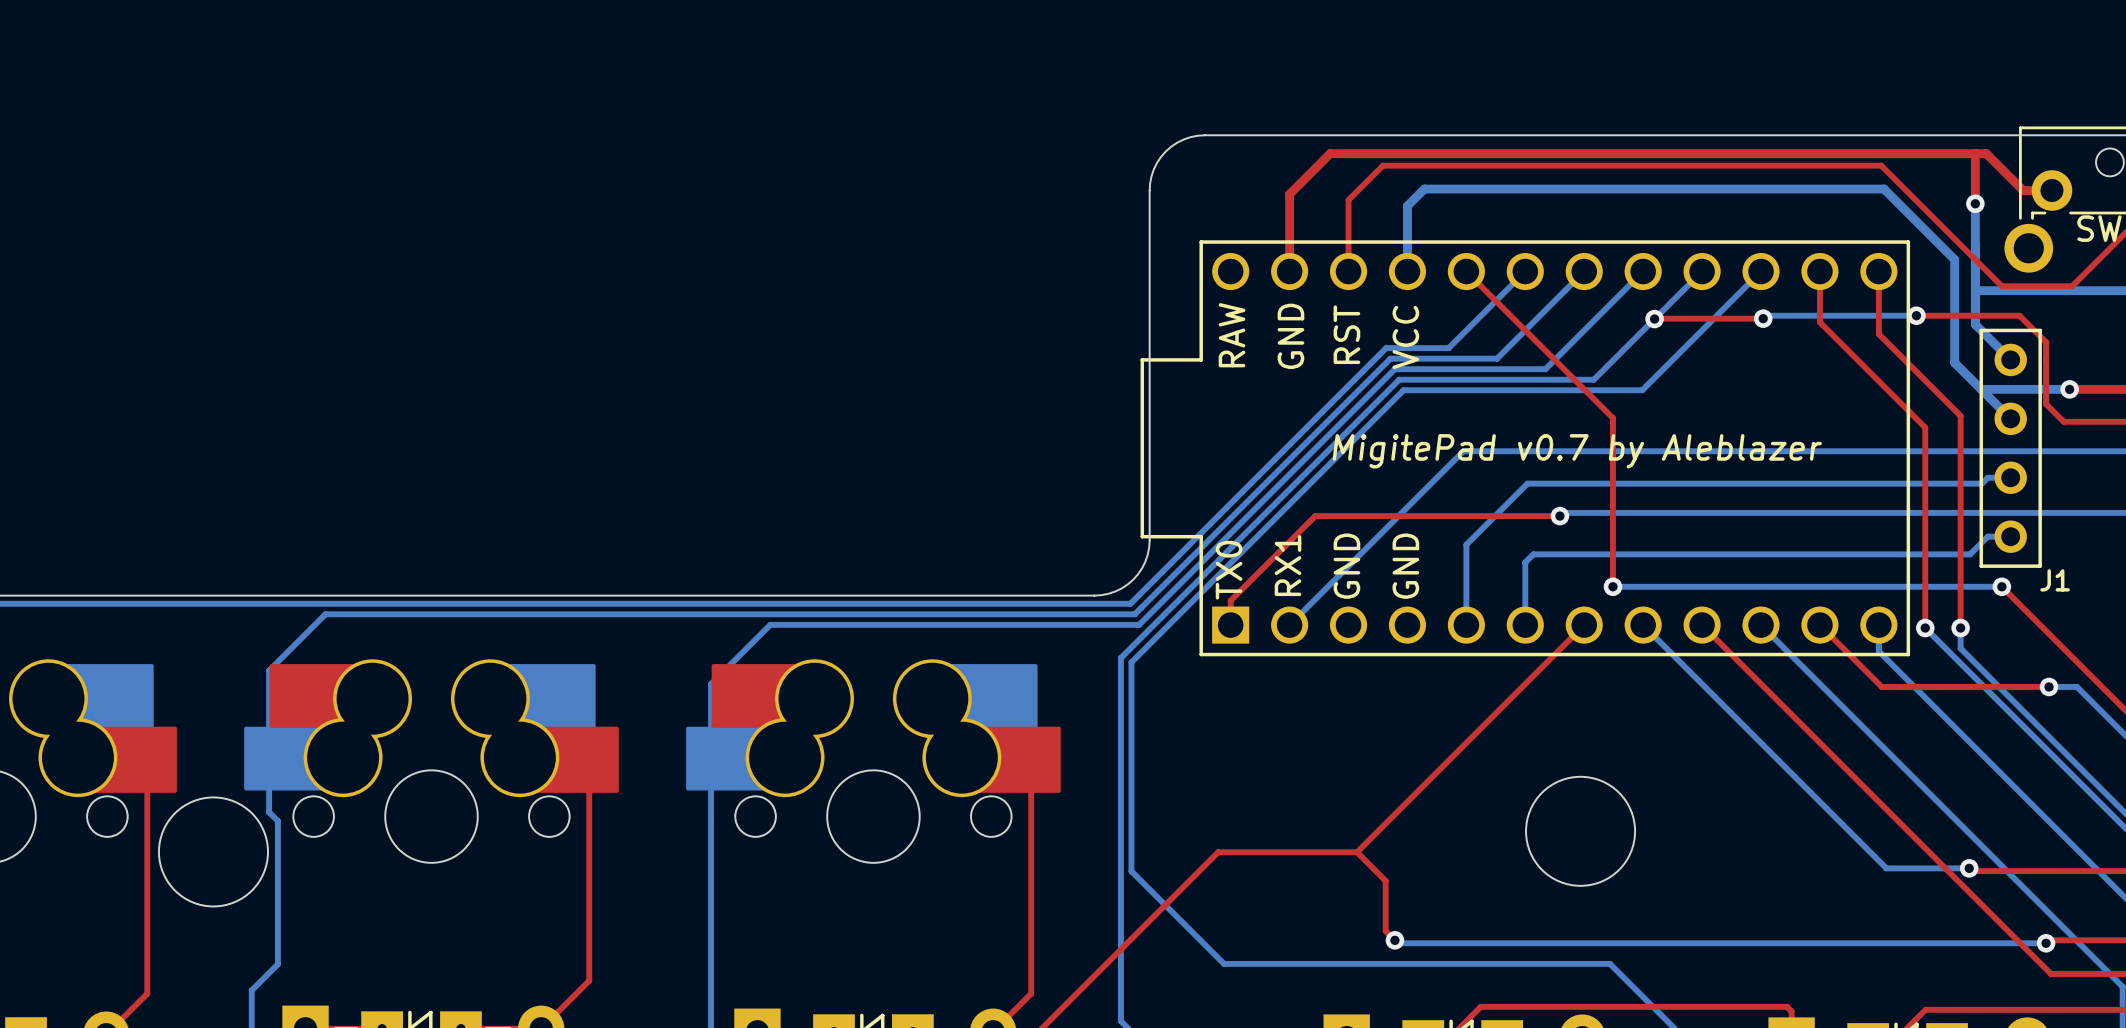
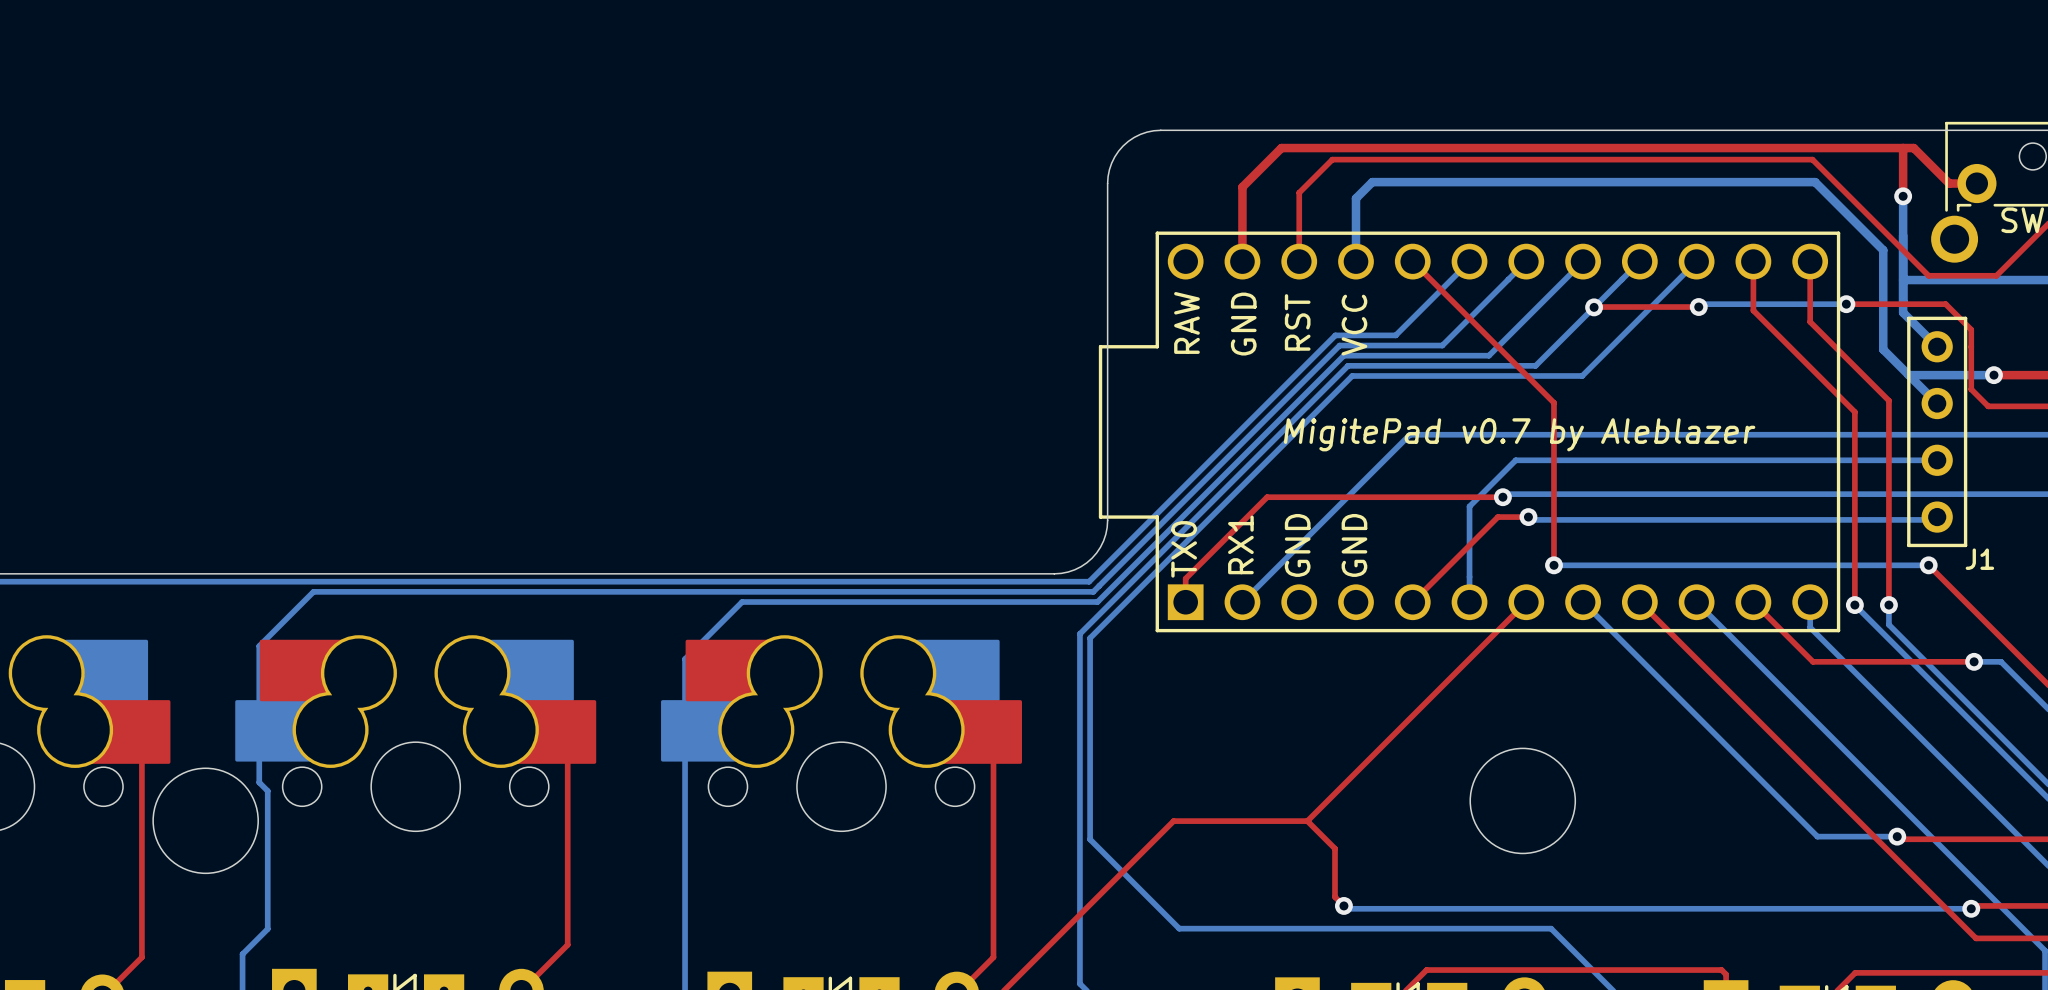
bottom track: (1987, 477) (1981, 483) (1527, 483) (1466, 544) (1466, 625) -> none
top track: none -> (1528, 517) (1497, 517) (1412, 602)
bottom track: none -> (1528, 517) (1531, 519) (1937, 519) (1937, 517)
via: none -> (1528, 517)
bottom track: (2010, 536) (1987, 536) (1970, 554) (1533, 554) (1525, 562) -> (1915, 460) (1515, 460) (1469, 506) (1469, 541)

